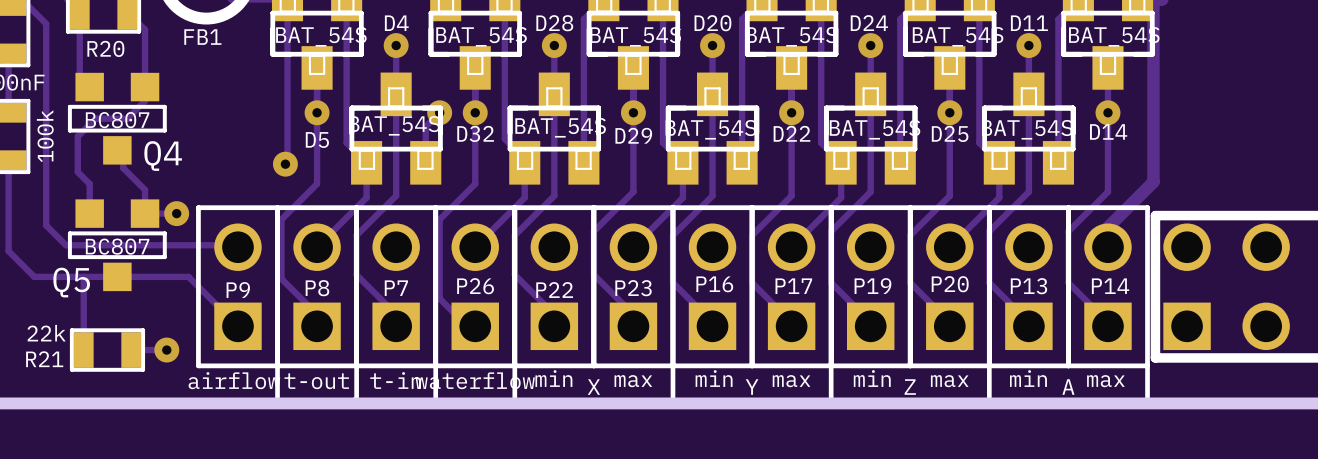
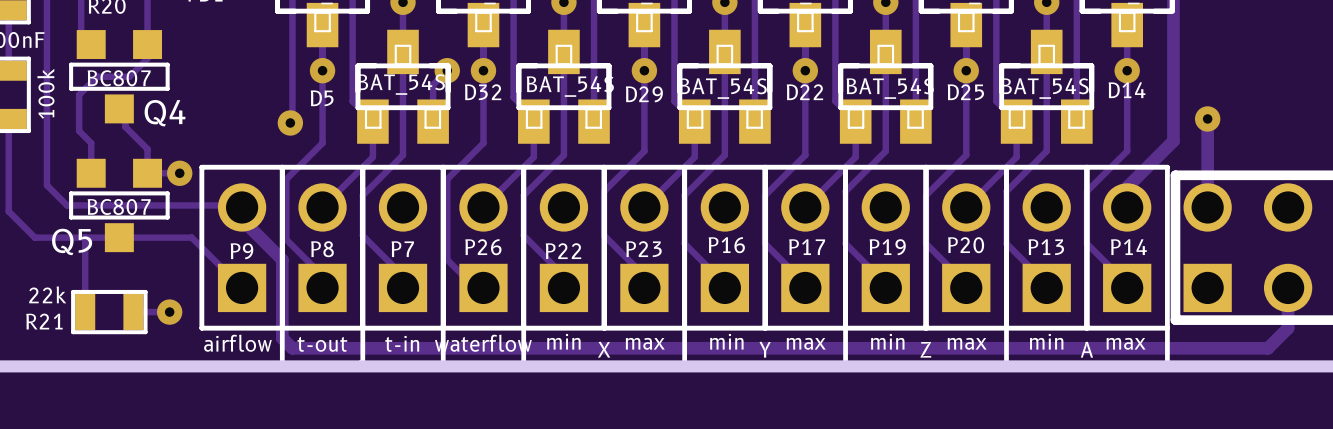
track: none -> (1207, 118) (1207, 207)
via: none -> (1207, 118)
track: none -> (242, 207) (242, 219) (282, 259) (282, 338) (292, 348) (1268, 348) (1288, 328) (1288, 287)

